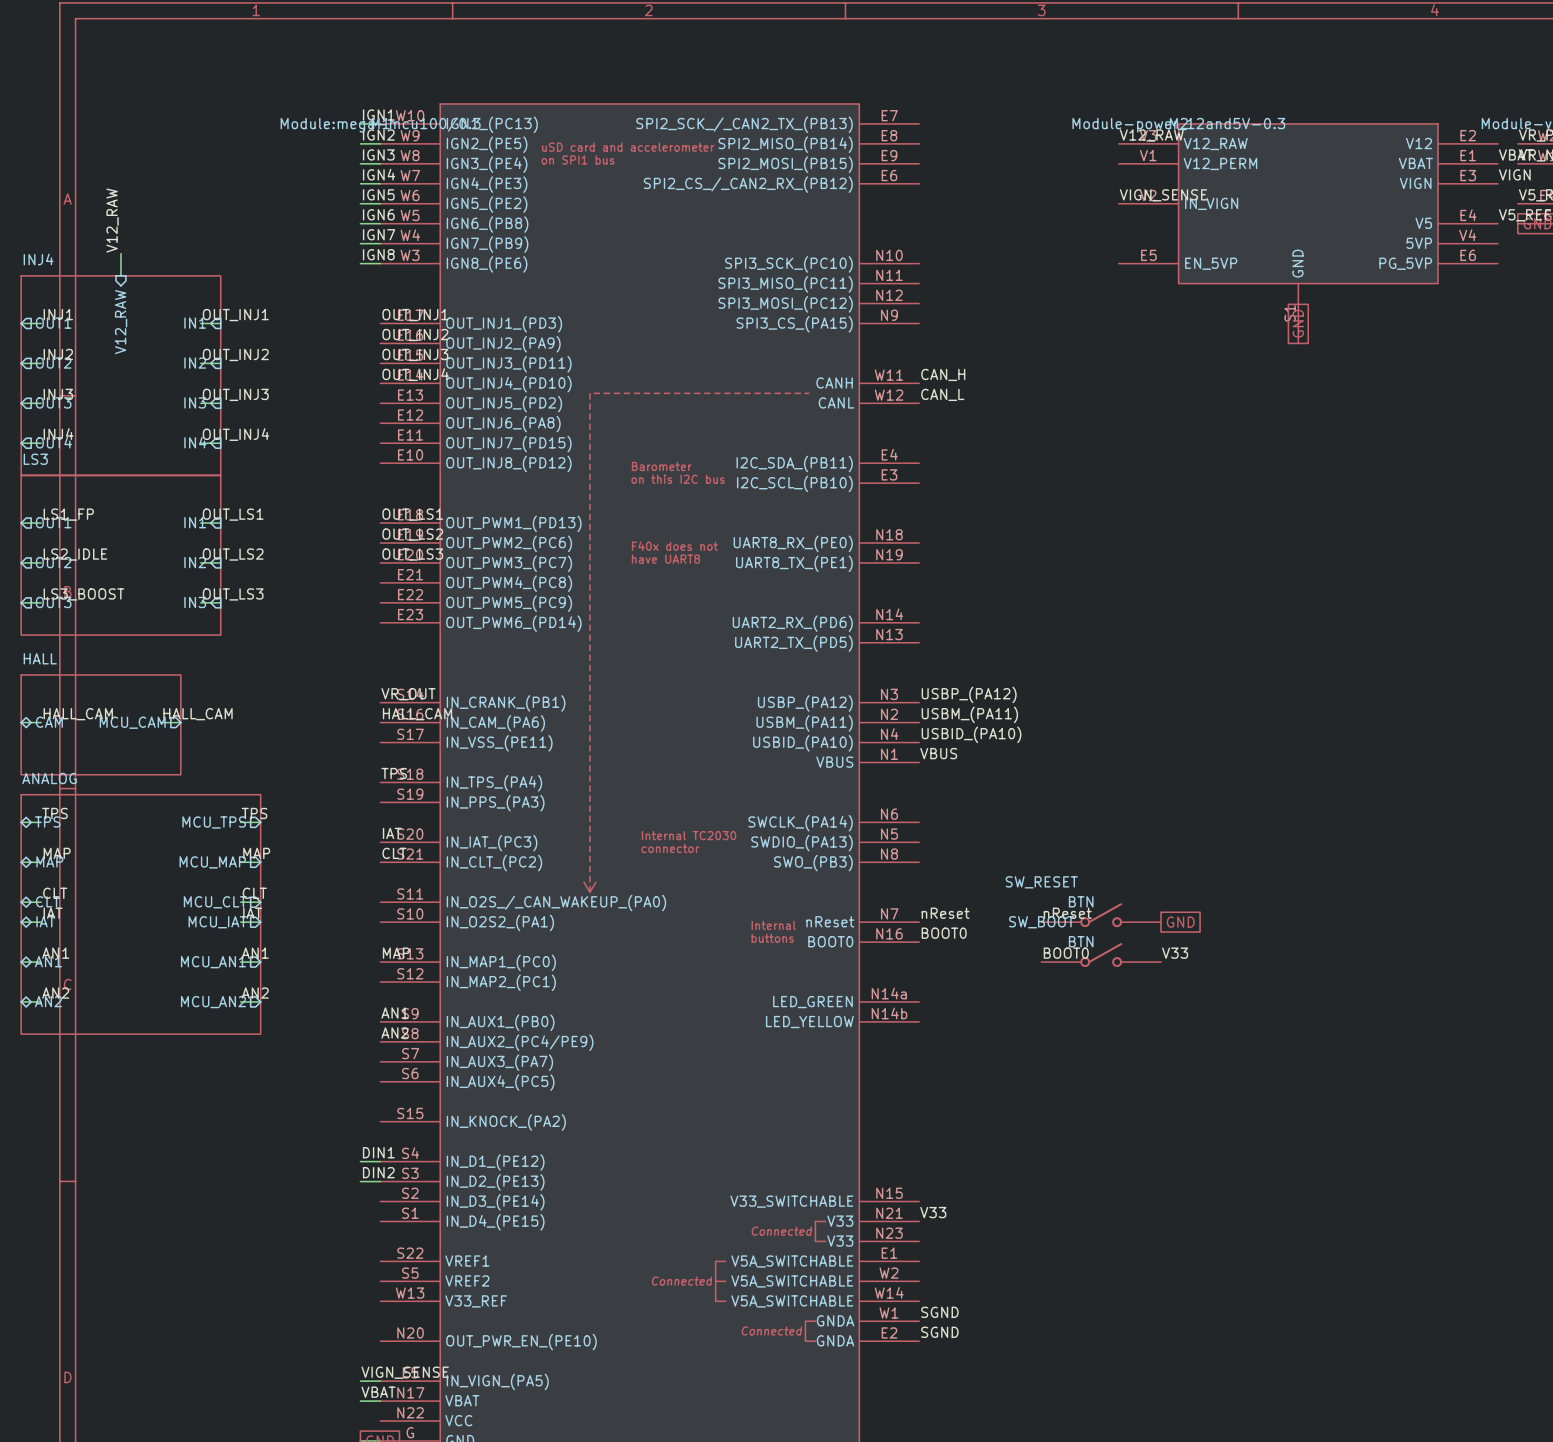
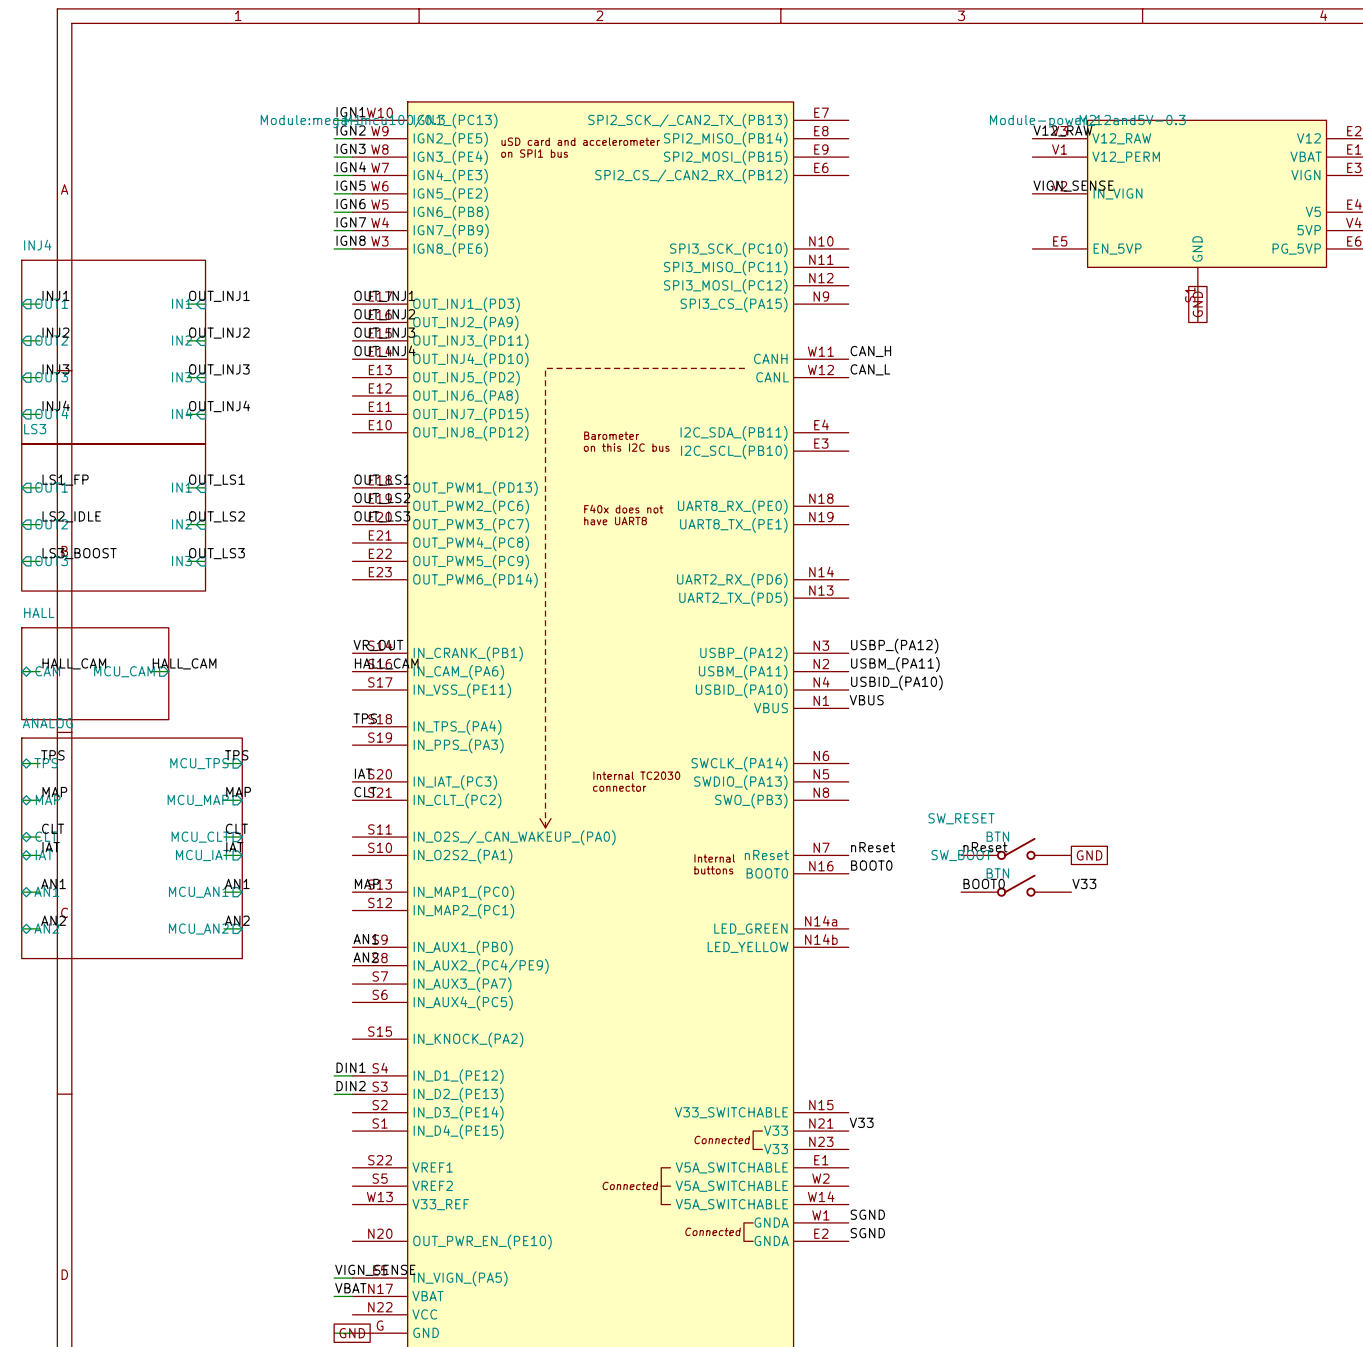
label: V12_RAW (112, 220) -> none
wire: (120, 253) (120, 275) -> none
sheet pin: V12_RAW (121, 322) -> none

